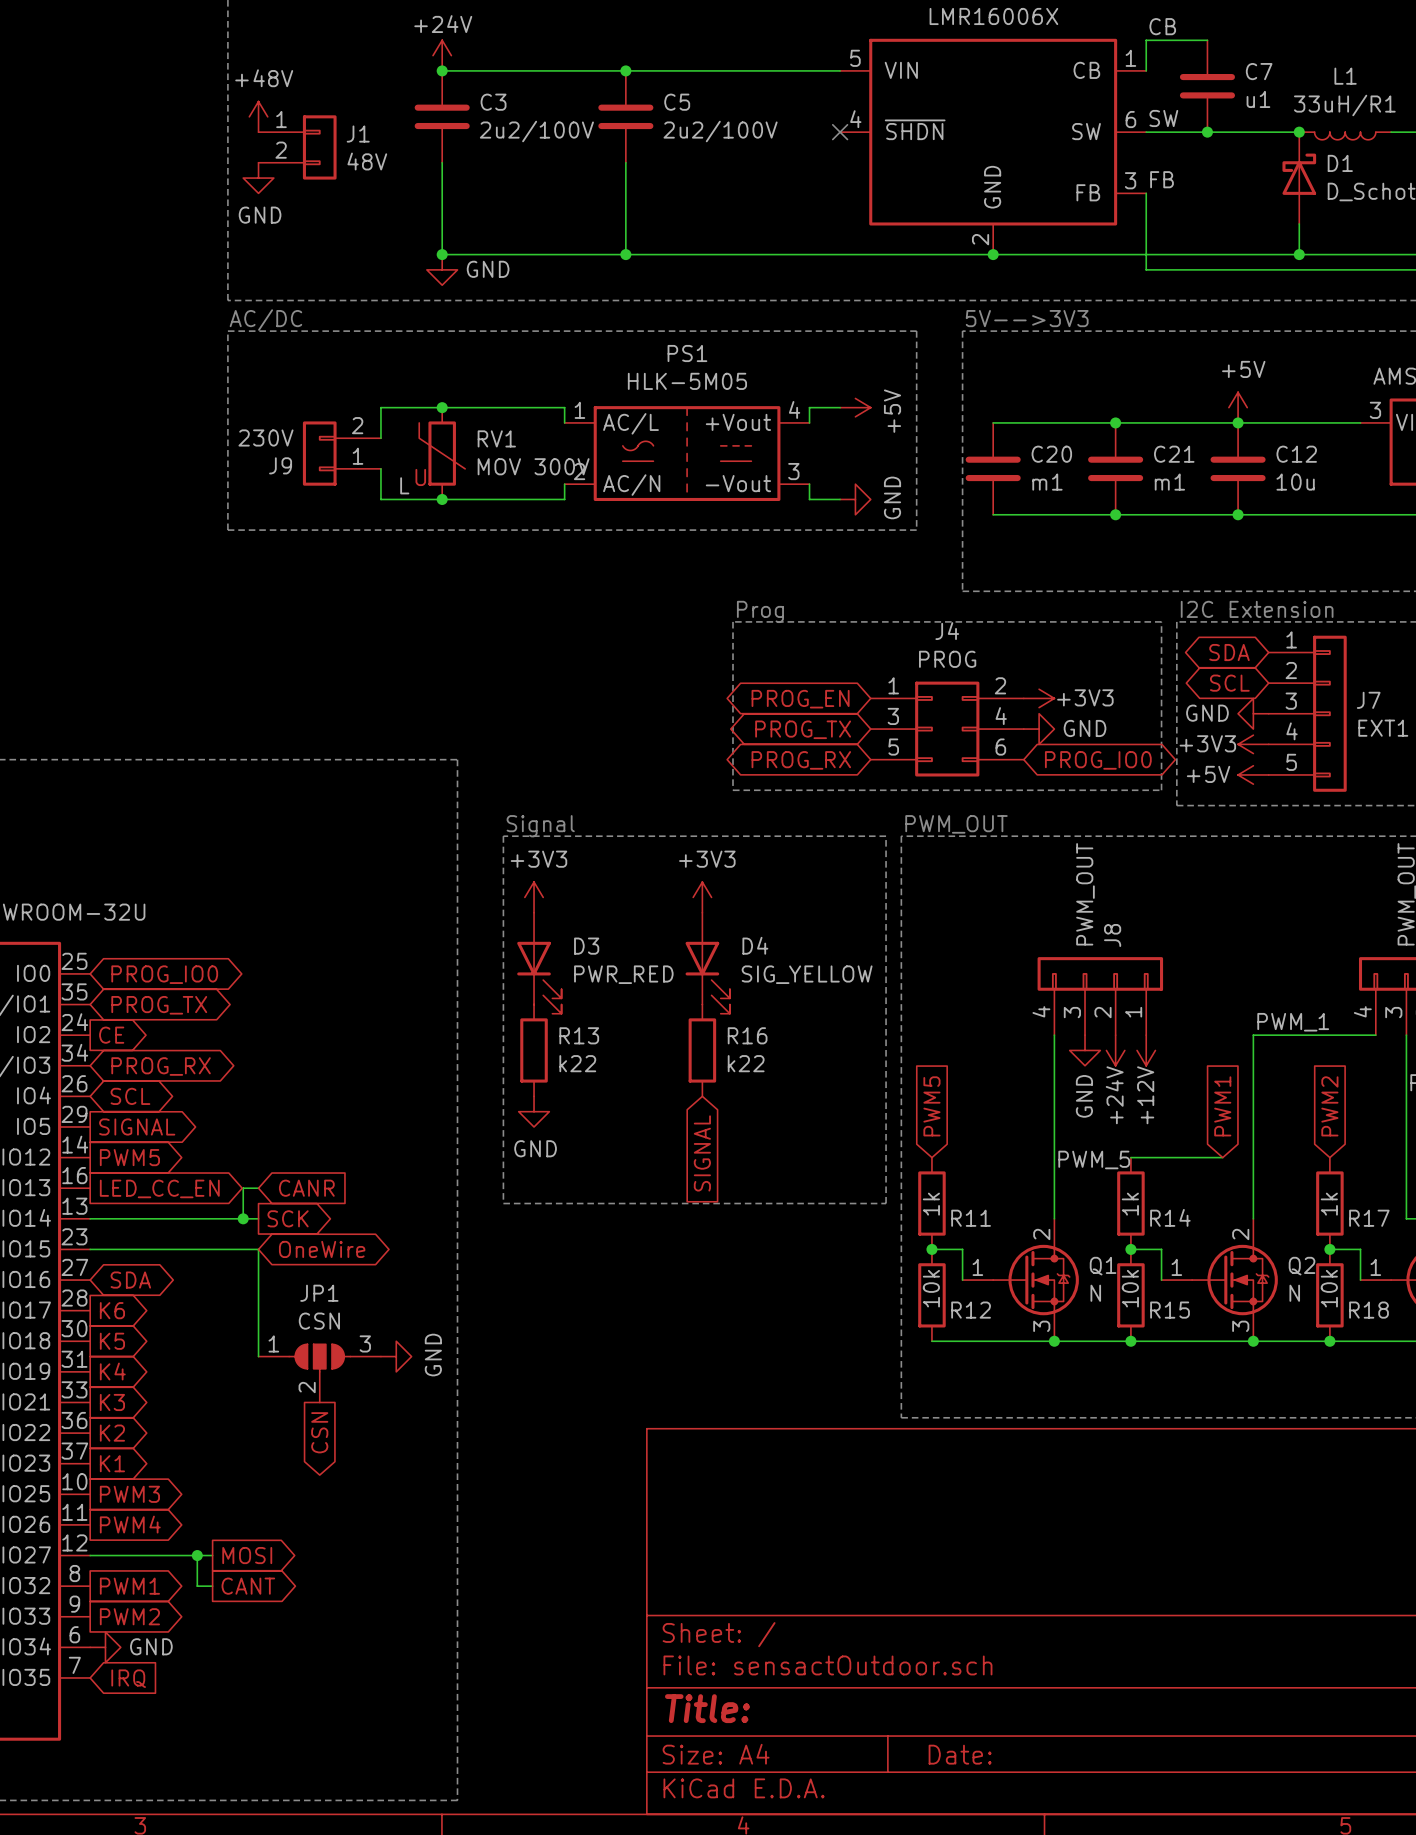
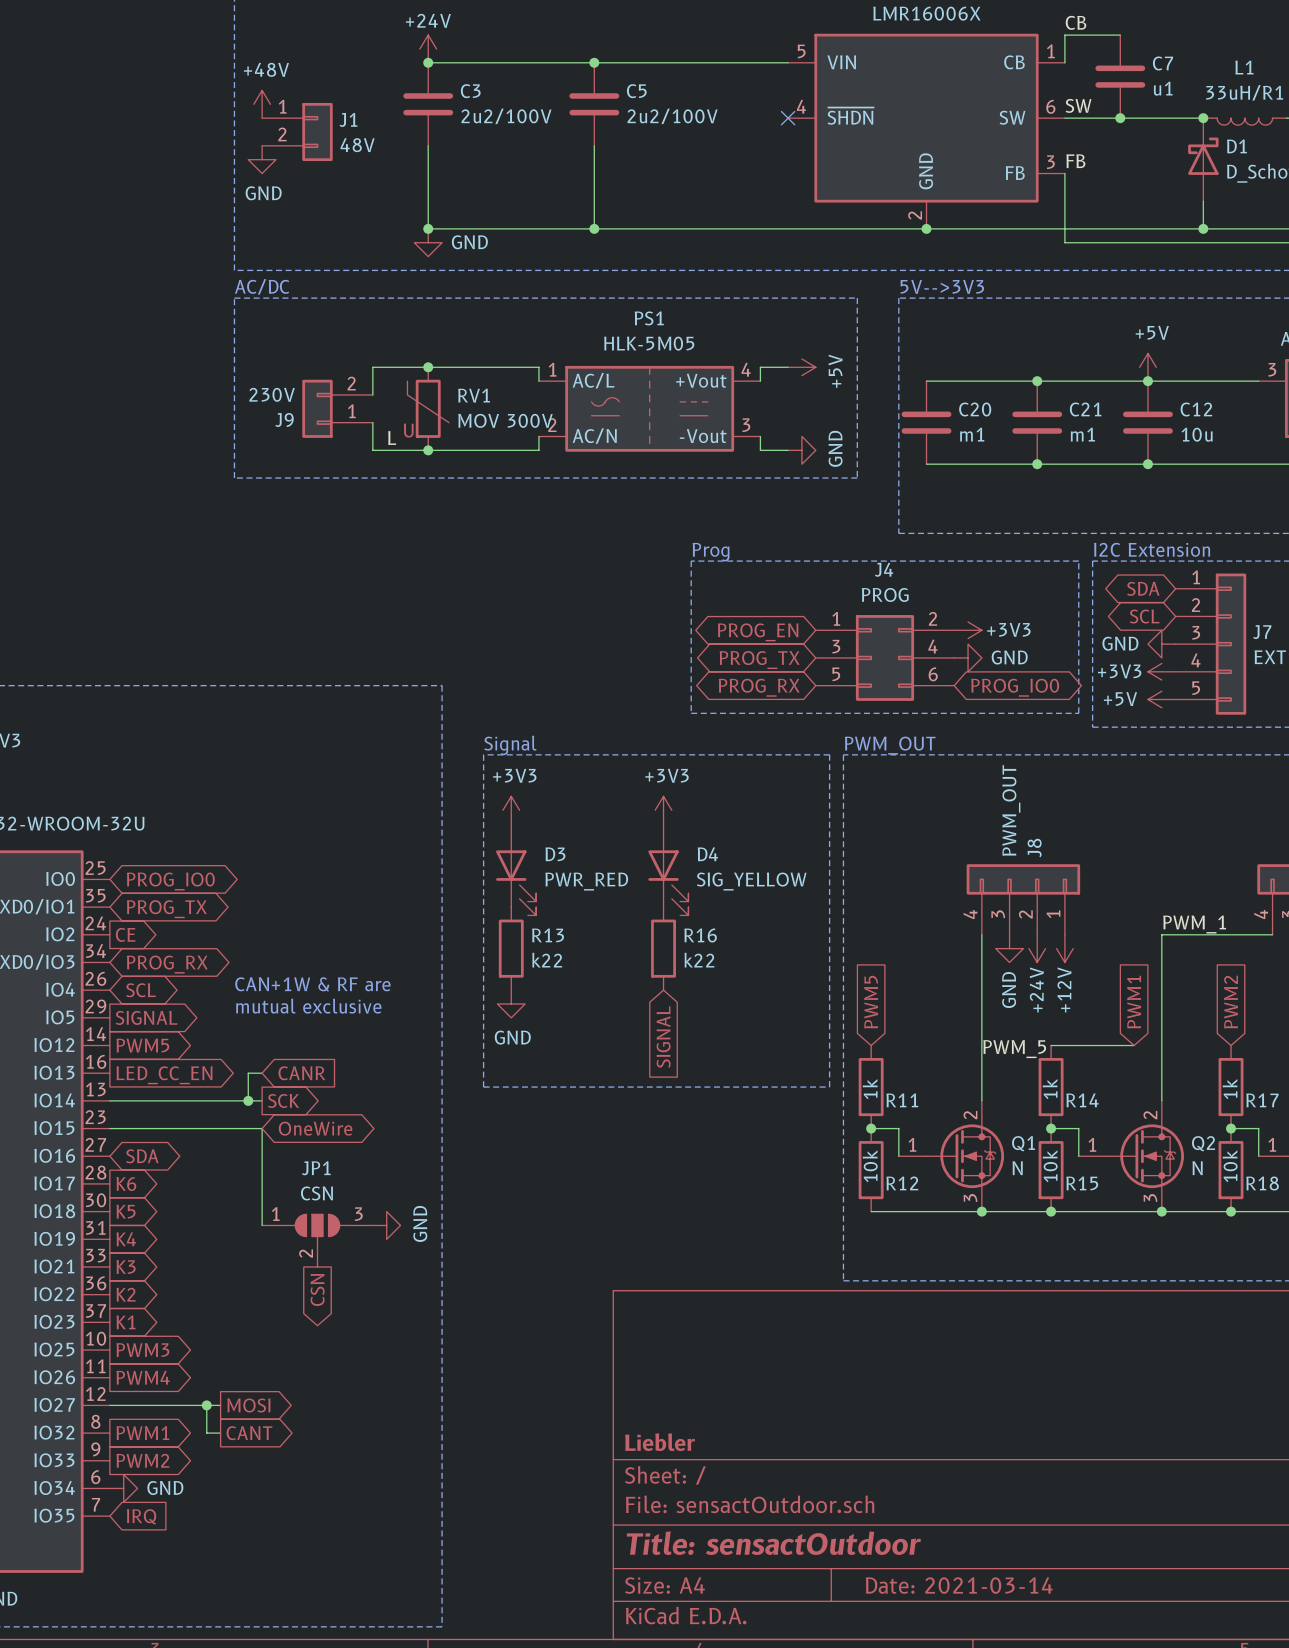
text: none -> CAN+1W & RF are (312, 984)
text: none -> mutual exclusive (308, 1006)
title block: none -> Liebler (660, 1442)
title block: Title: (707, 1708) -> Title: sensactOutdoor (773, 1543)
title block: Date: (960, 1754) -> Date: 2021-03-14 (959, 1585)

